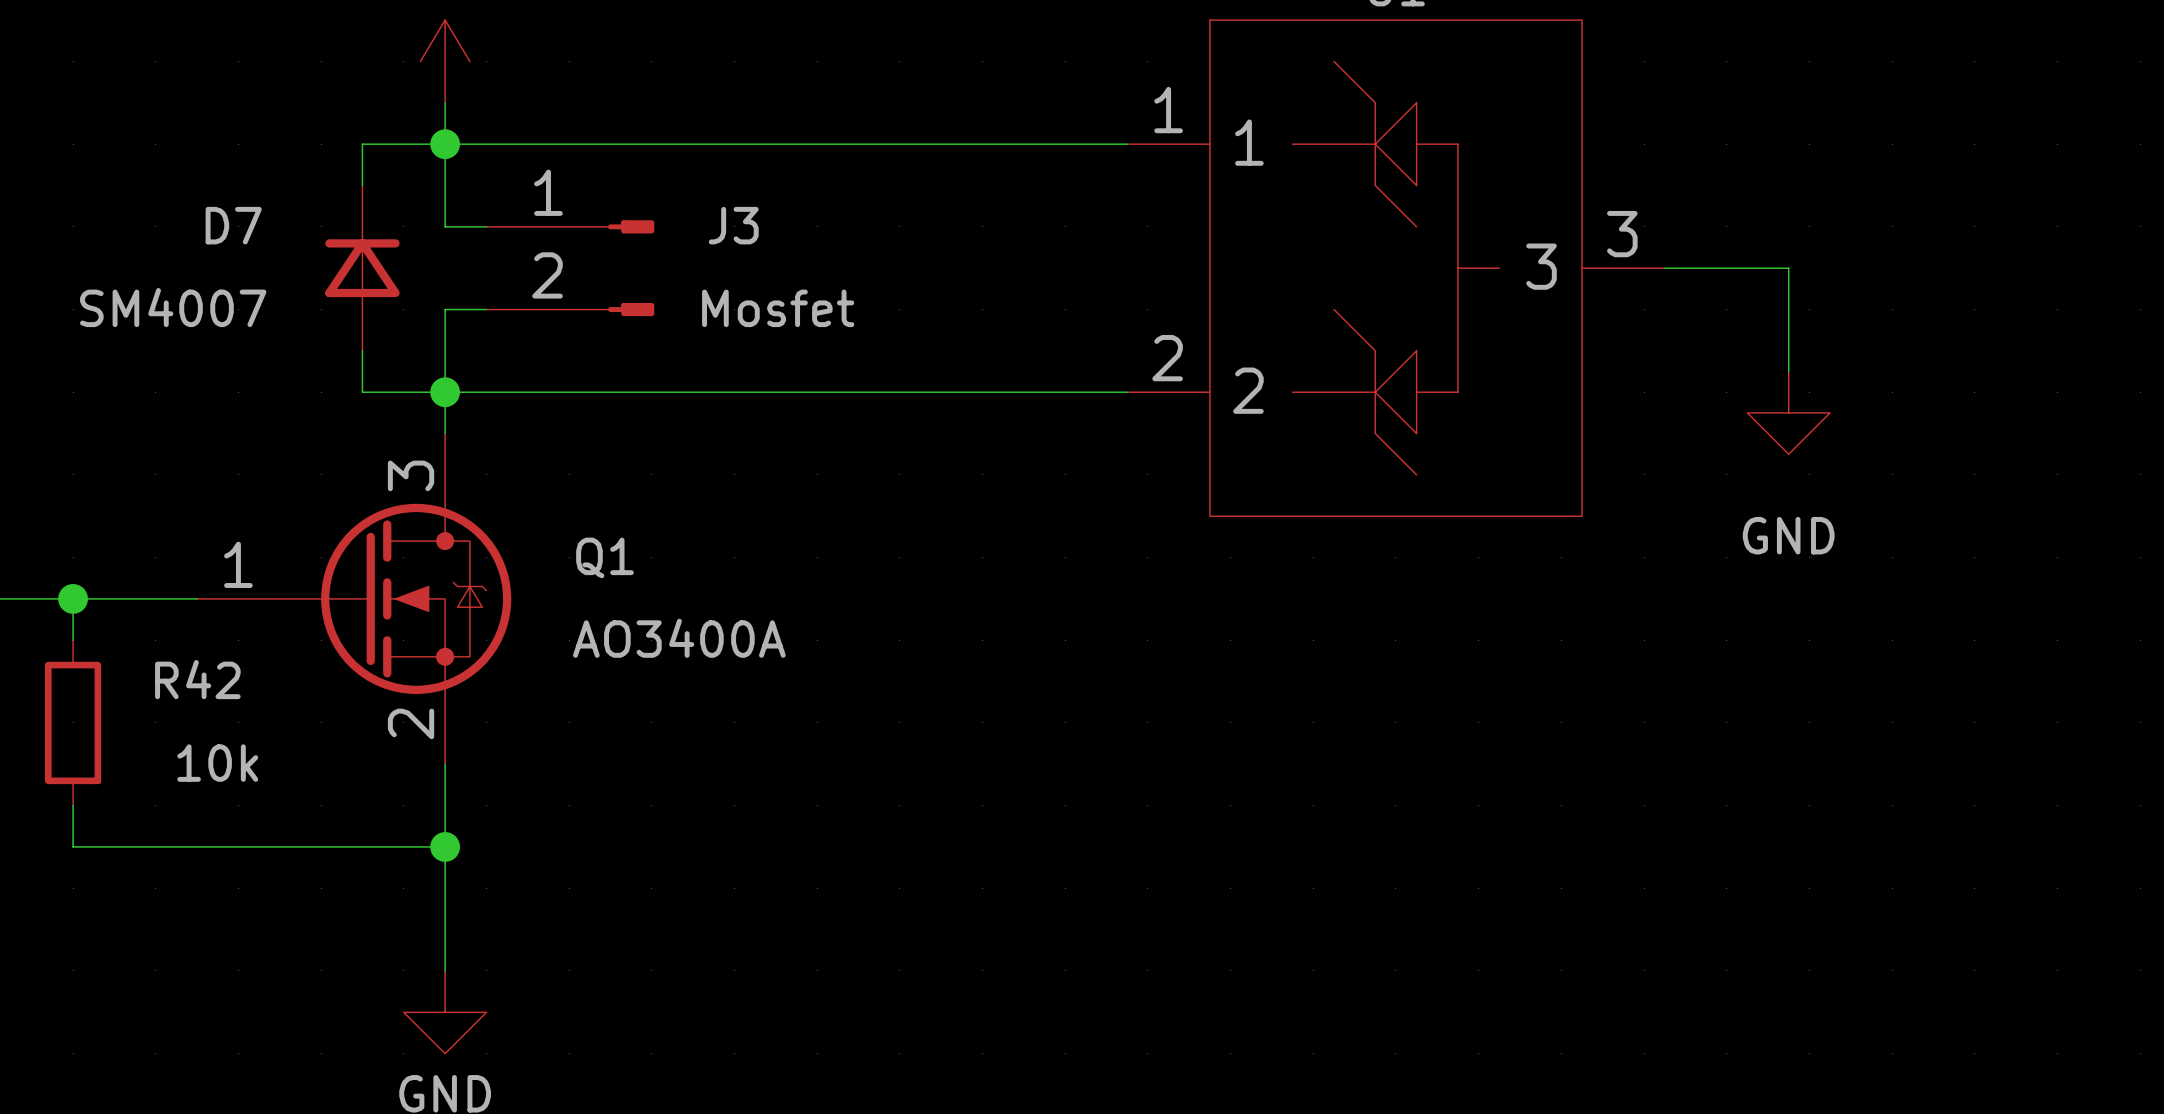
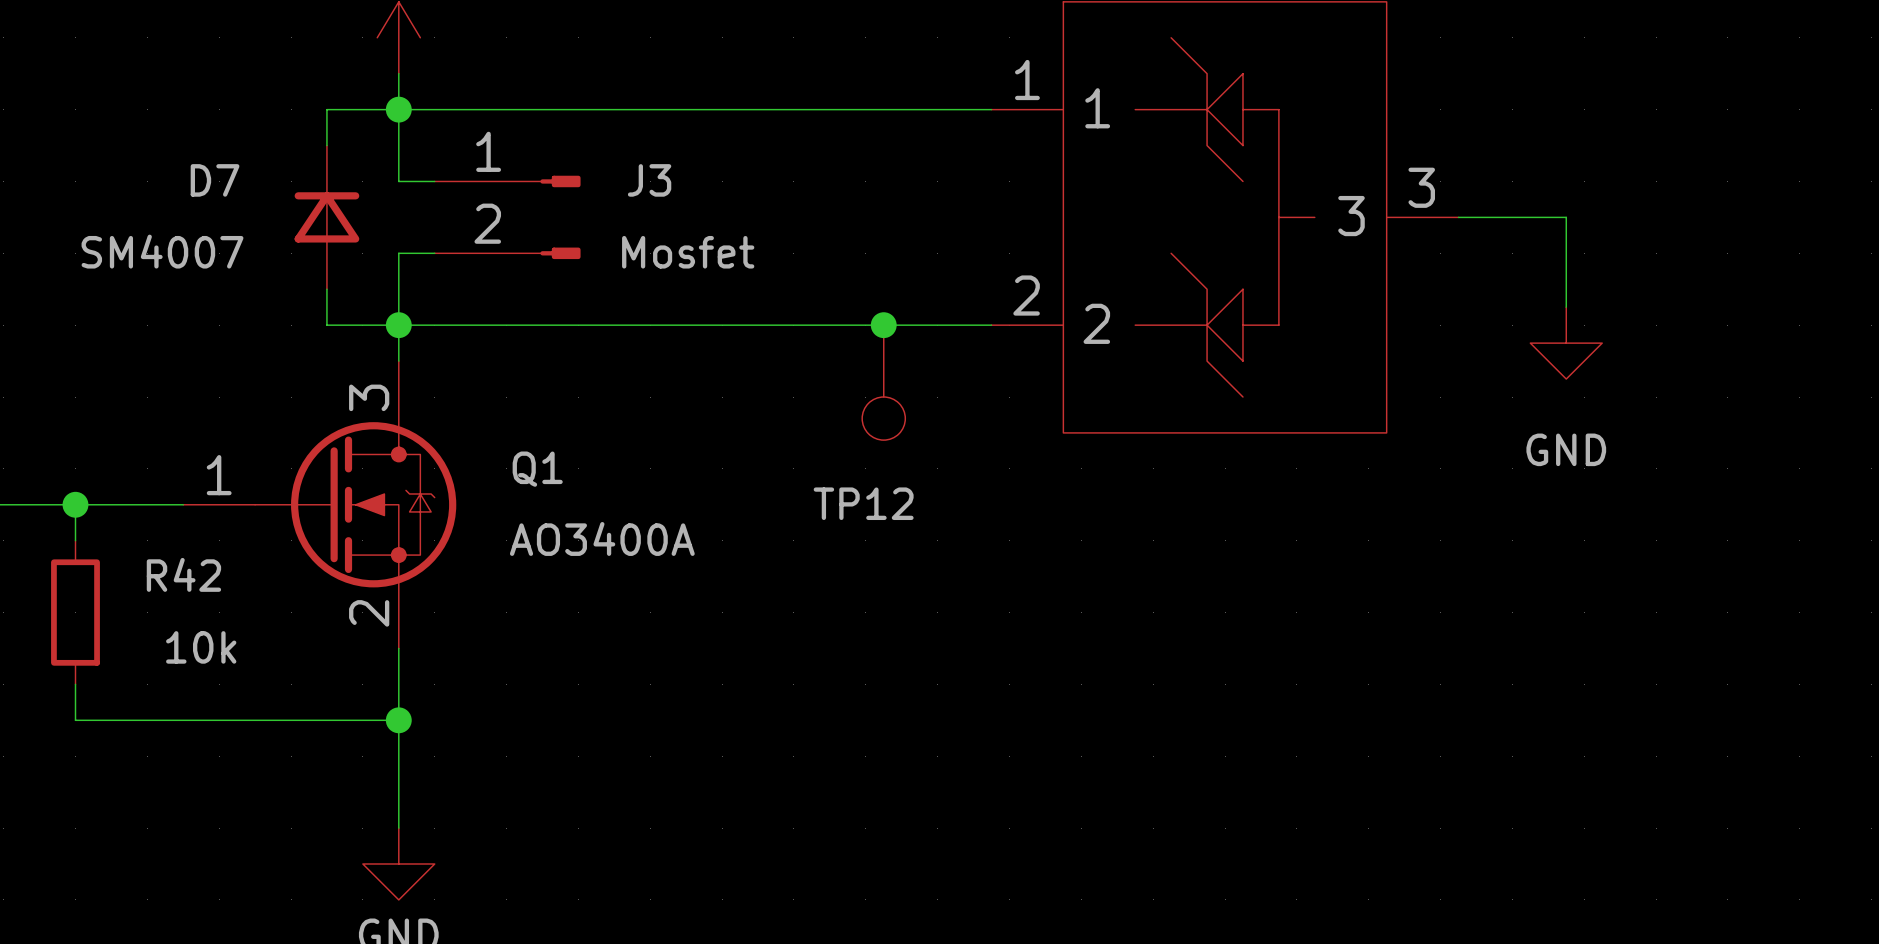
junction: none -> (883, 325)
TP12: none -> (883, 382)

